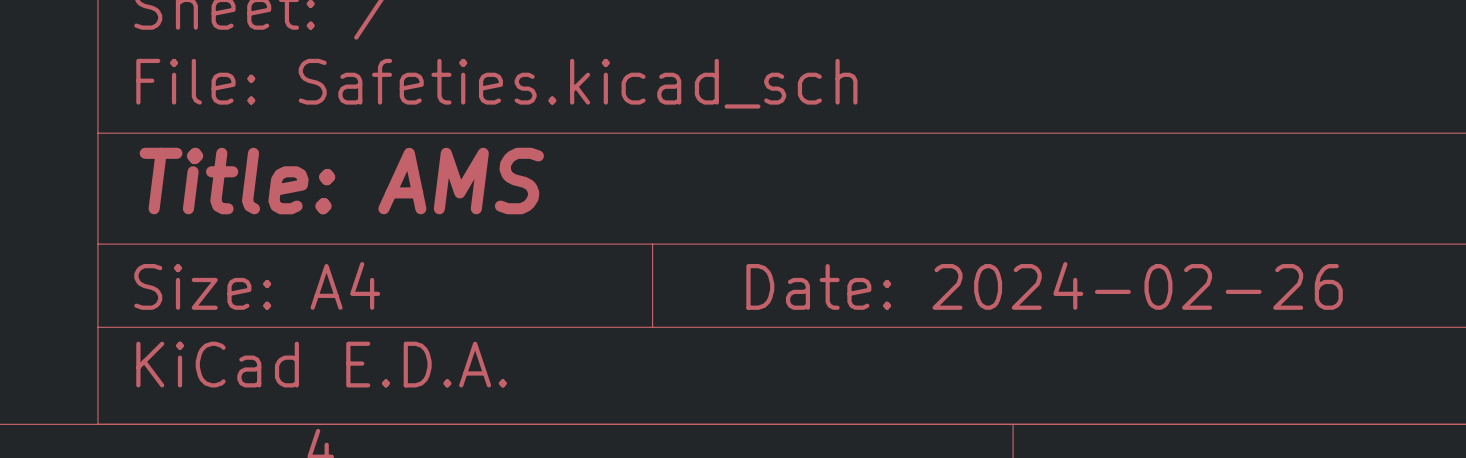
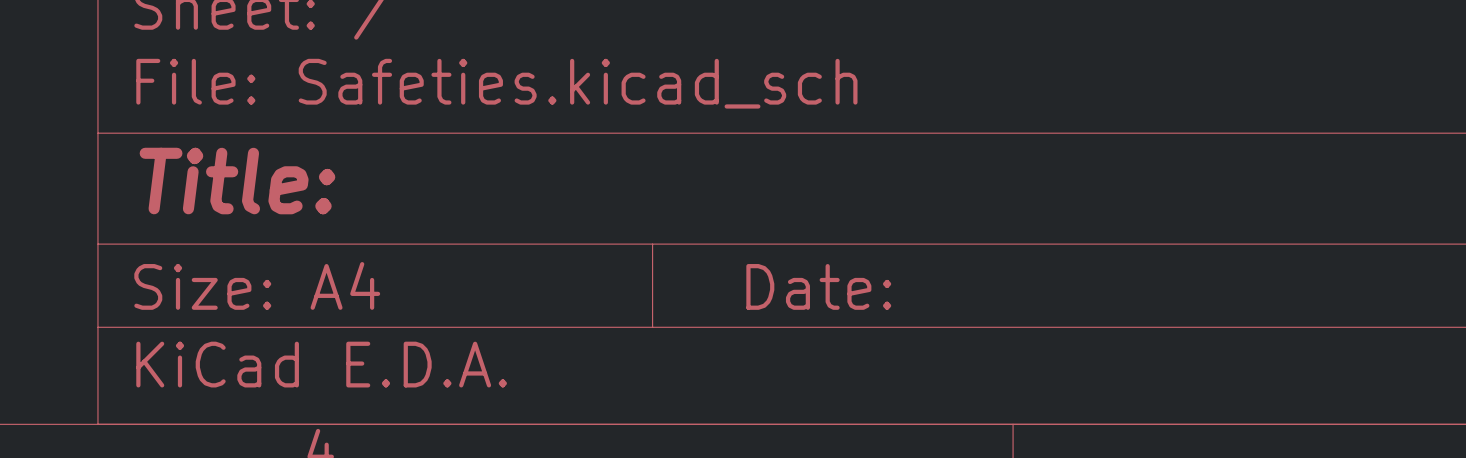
title block: Title: AMS (341, 181) -> Title: (237, 181)
title block: Date: 2024-02-26 (1044, 285) -> Date: (818, 286)

